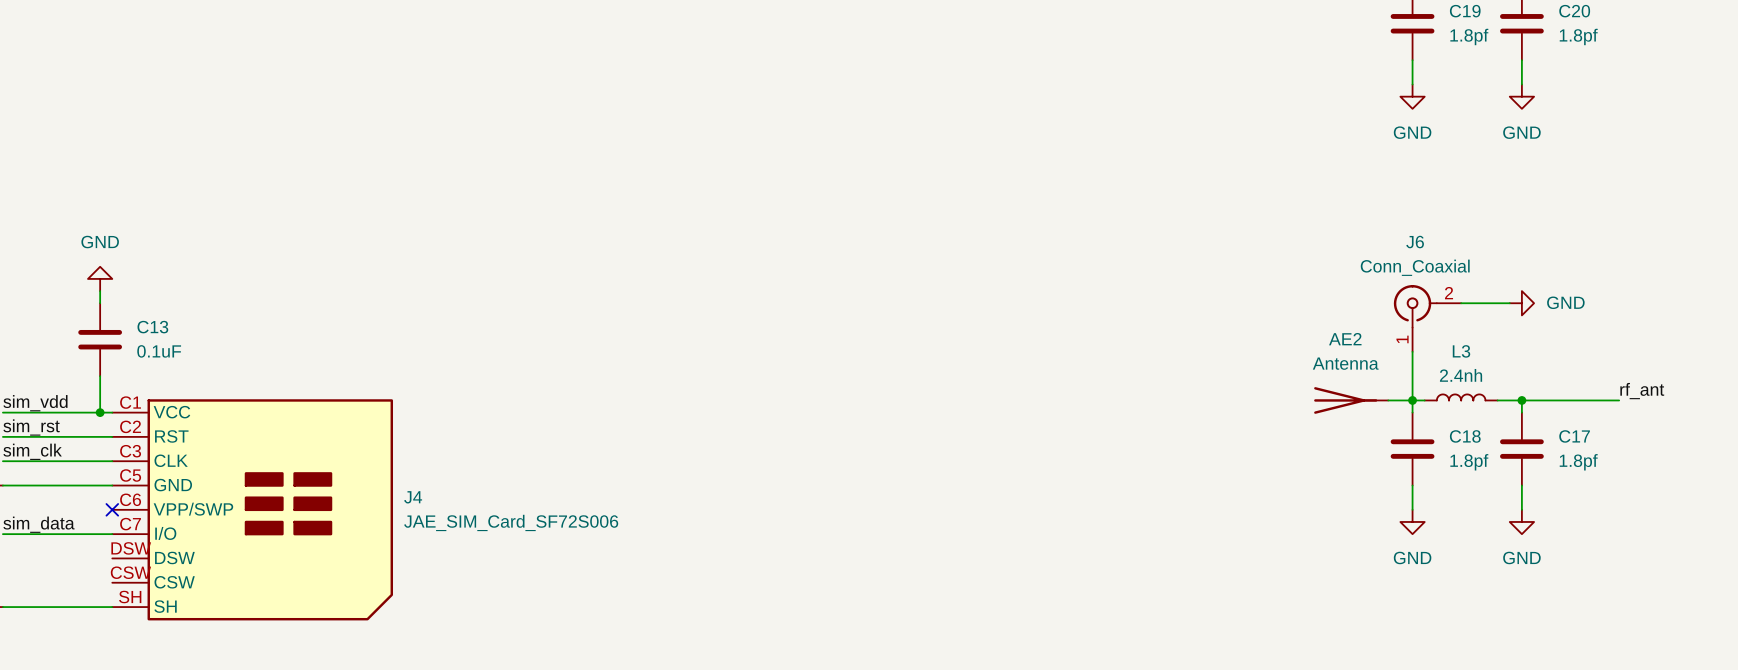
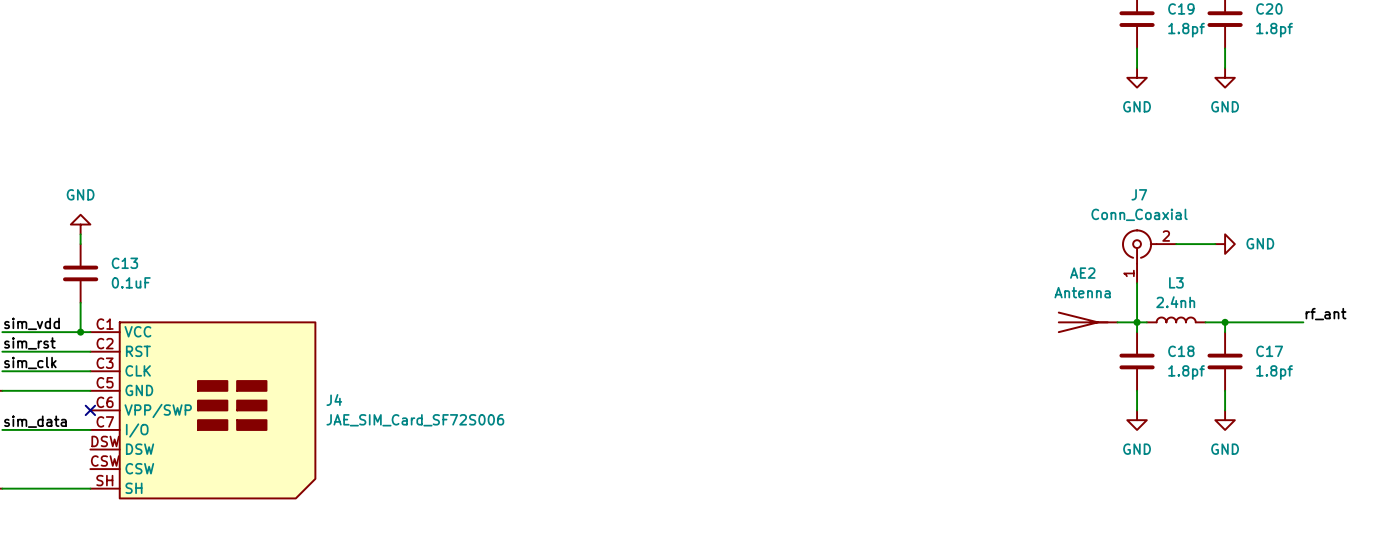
J6 name: J6 (1415, 242) -> J7 (1139, 194)

